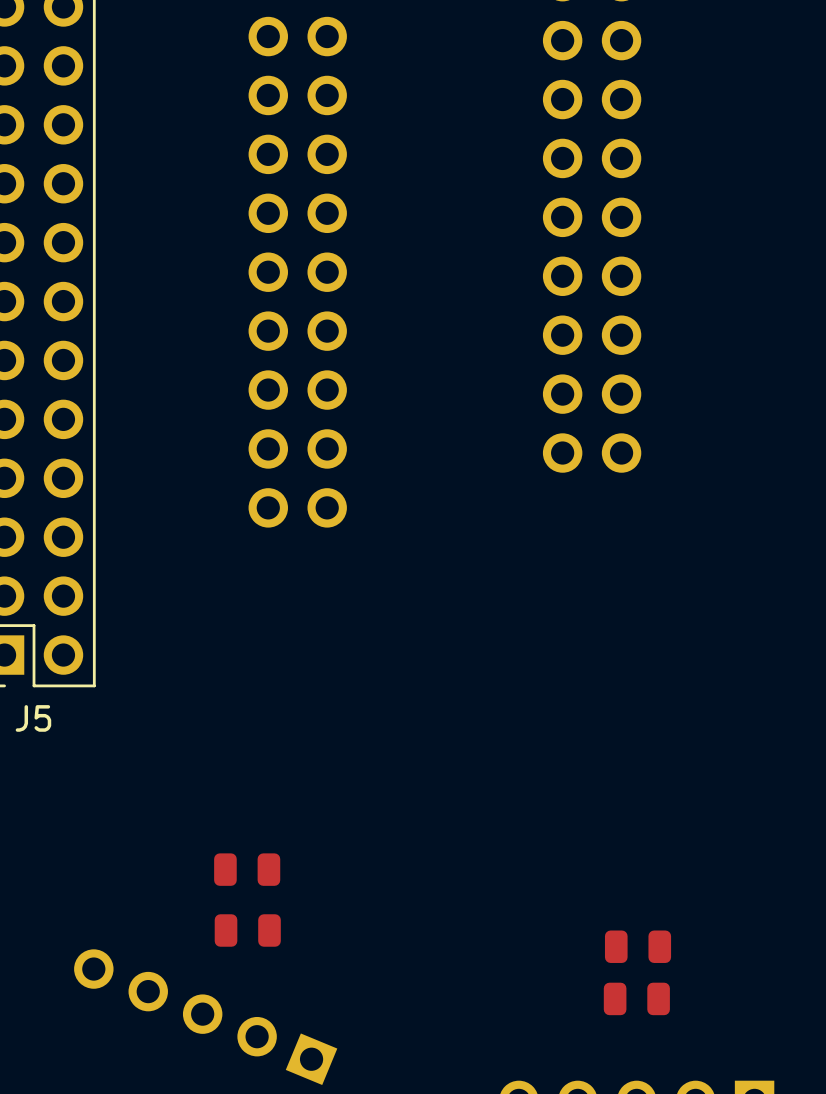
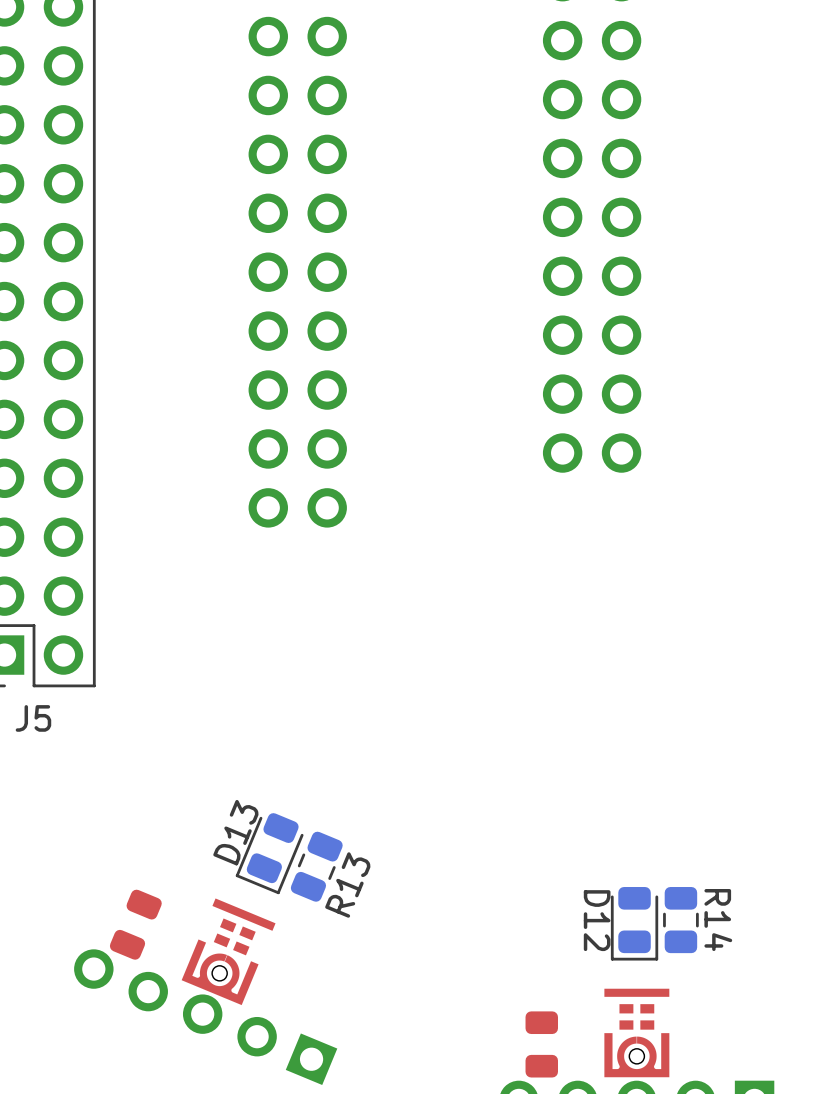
R13 side: top (247, 869) -> bottom (316, 866)
part: none -> (135, 924)
D13 side: top (247, 930) -> bottom (269, 853)
R14 side: top (638, 946) -> bottom (680, 920)
part: none -> (228, 951)
D12 side: top (636, 998) -> bottom (634, 923)
part: none -> (636, 1032)
part: none -> (541, 1044)

